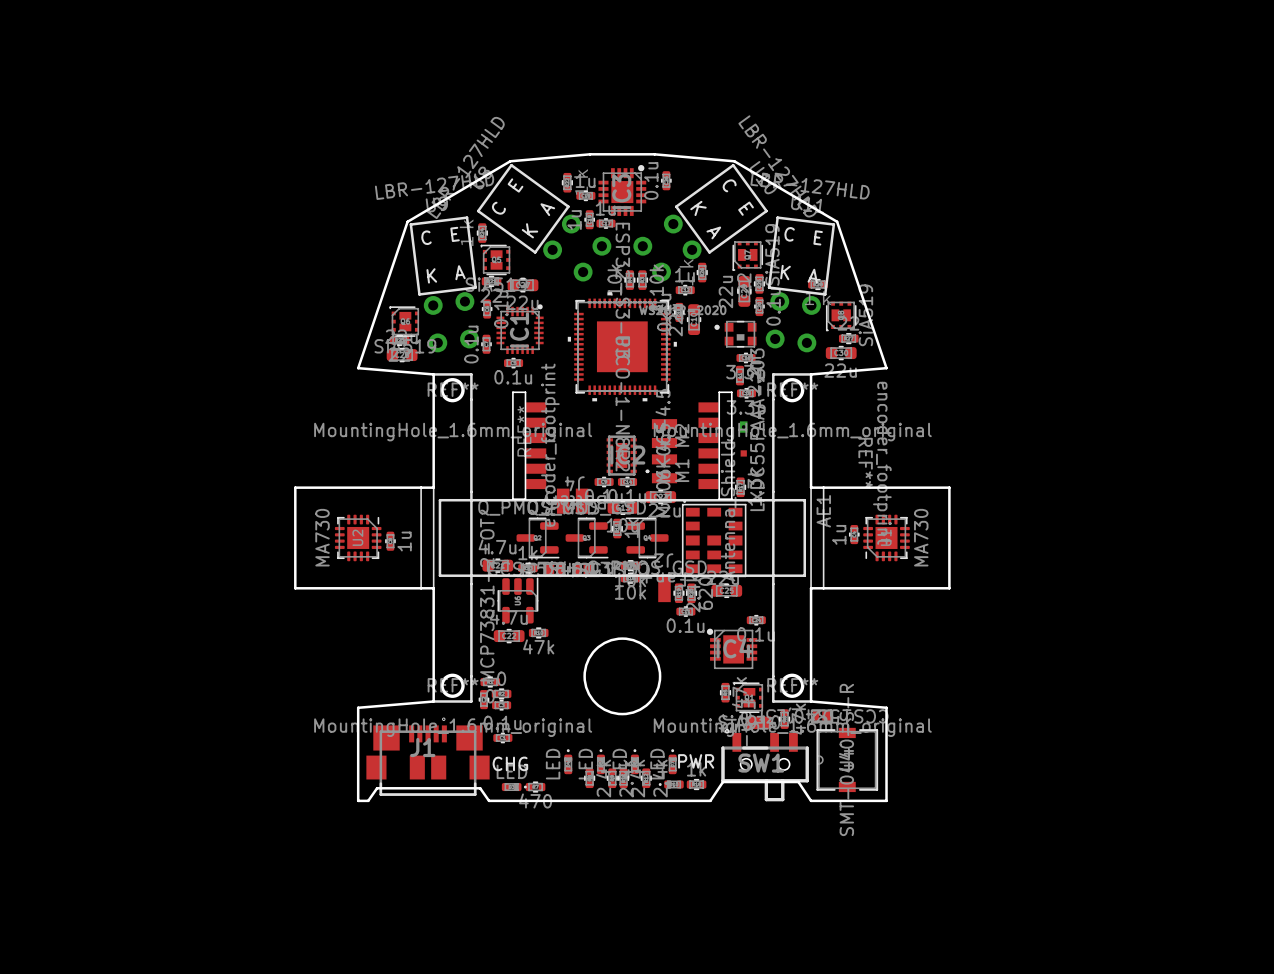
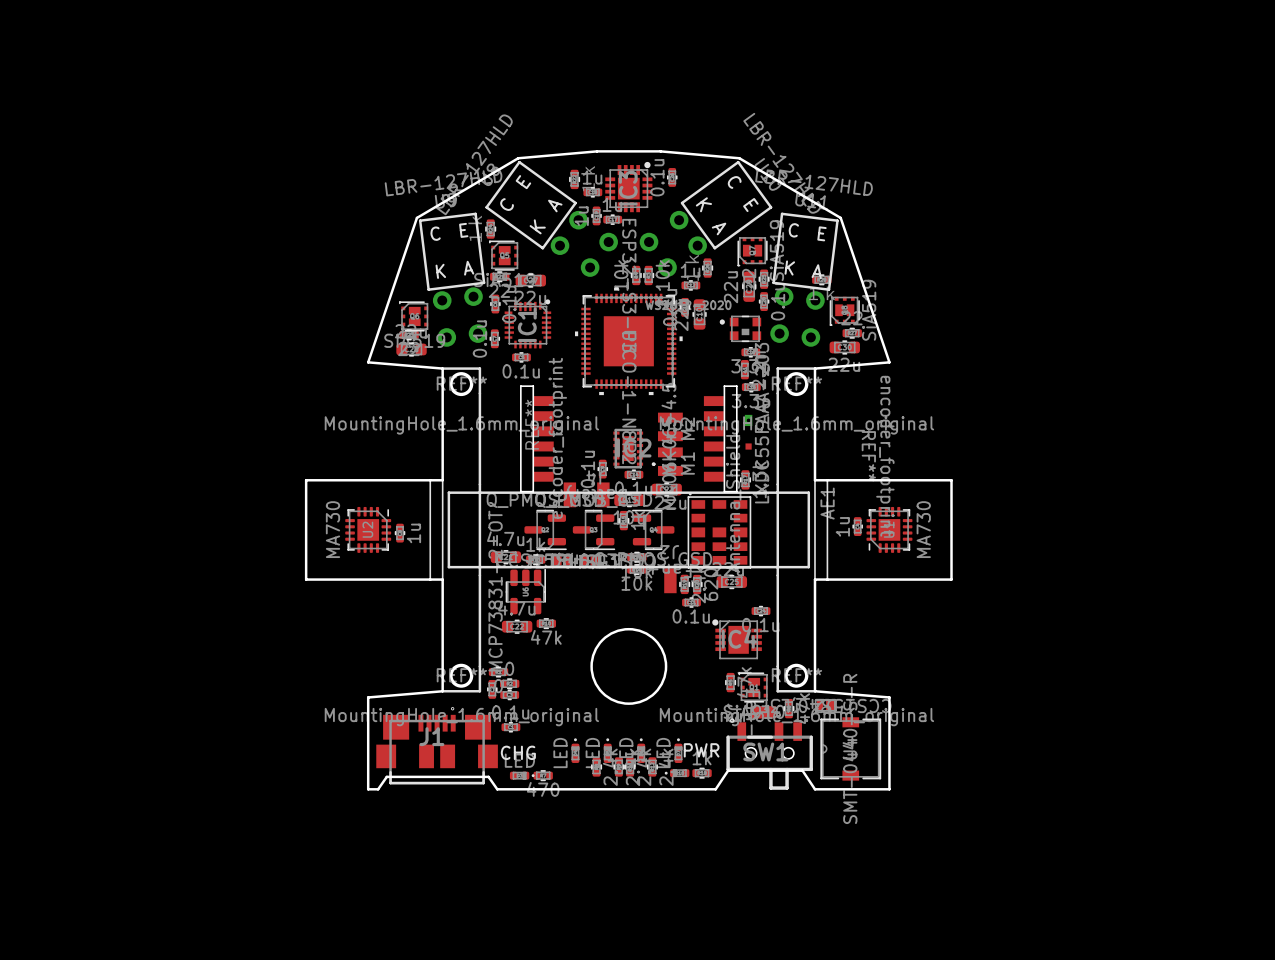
part rotation: 0° (604, 482) -> 90° clockwise (602, 469)
J4 footprint: [556, 488, 589, 514] -> [563, 482, 610, 508]

